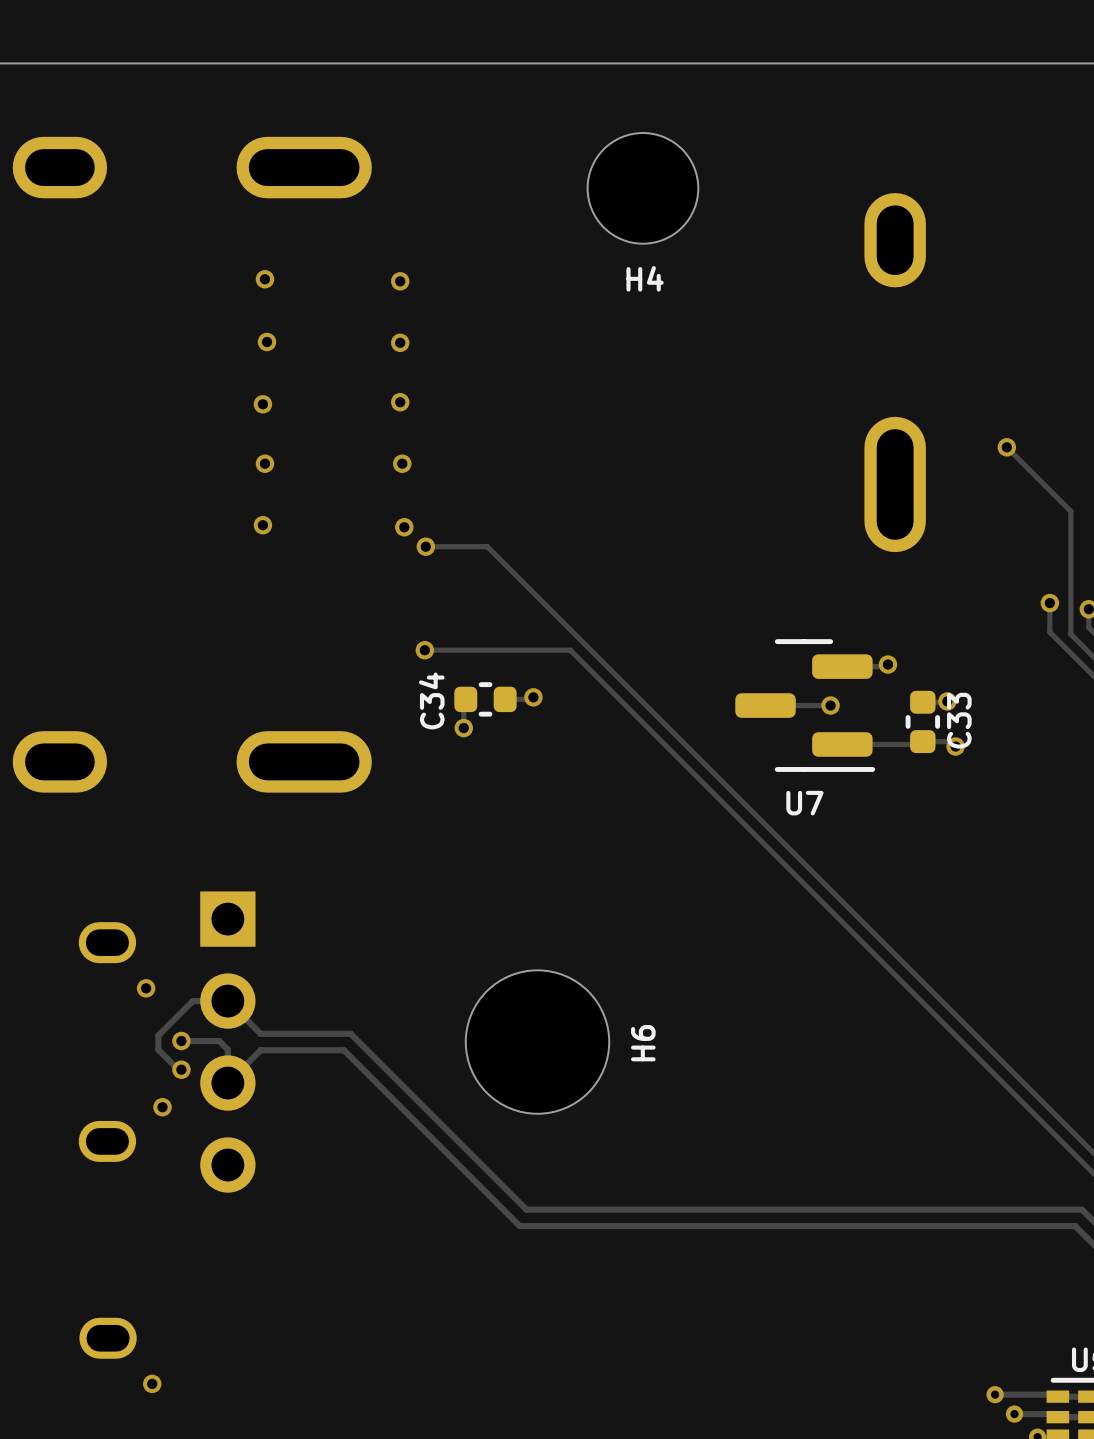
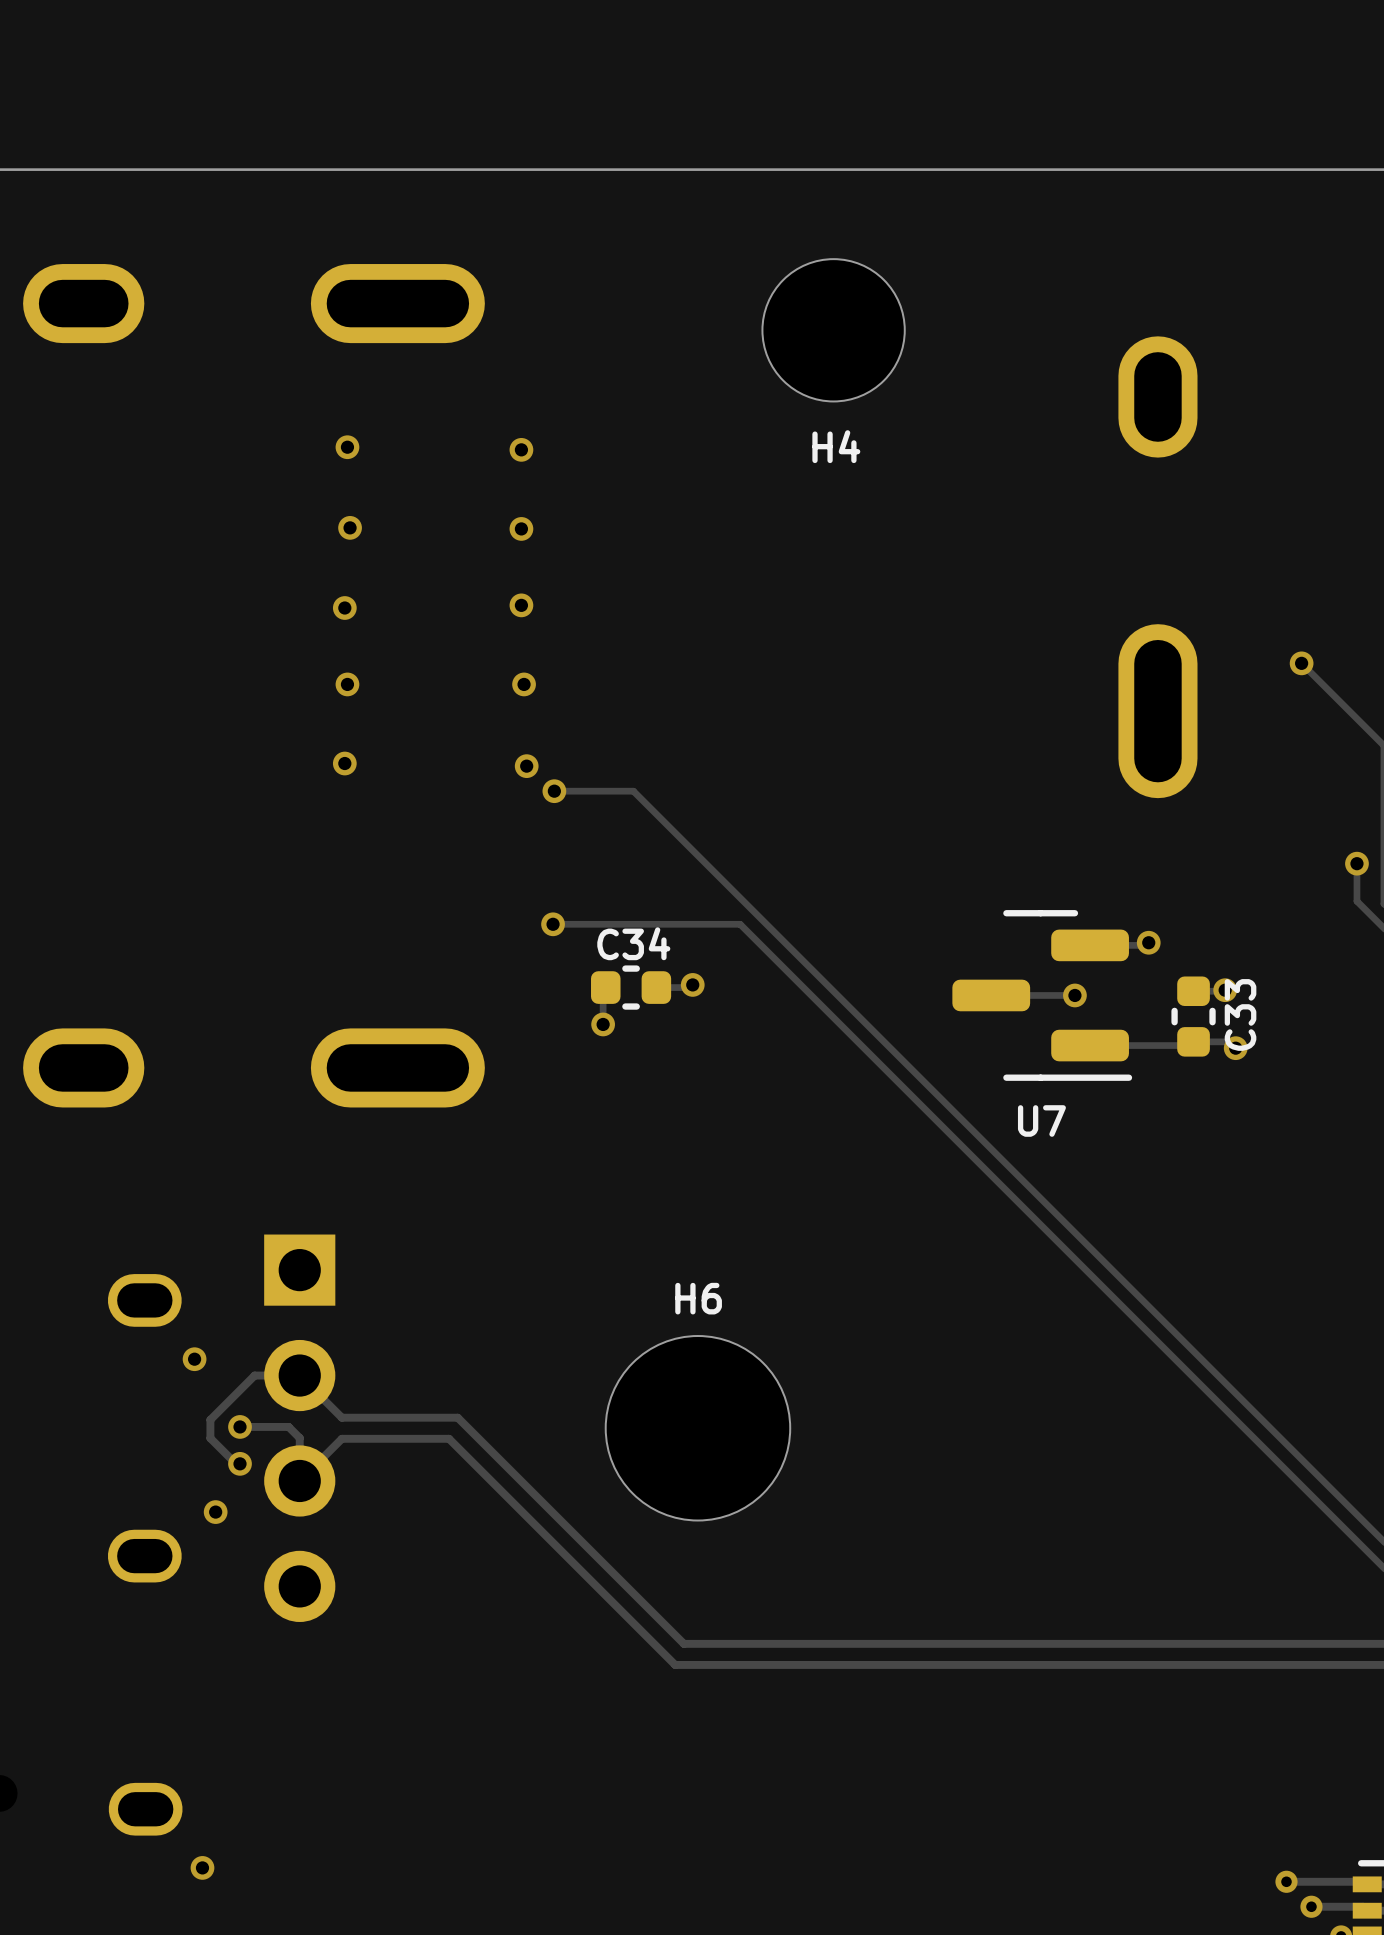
C34 name rotation: 0° (431, 700) -> 90° clockwise (633, 943)
H6 name rotation: 0° (643, 1043) -> 90° clockwise (698, 1298)
H6 name position: H6 (643, 1043) -> H6 (698, 1298)

